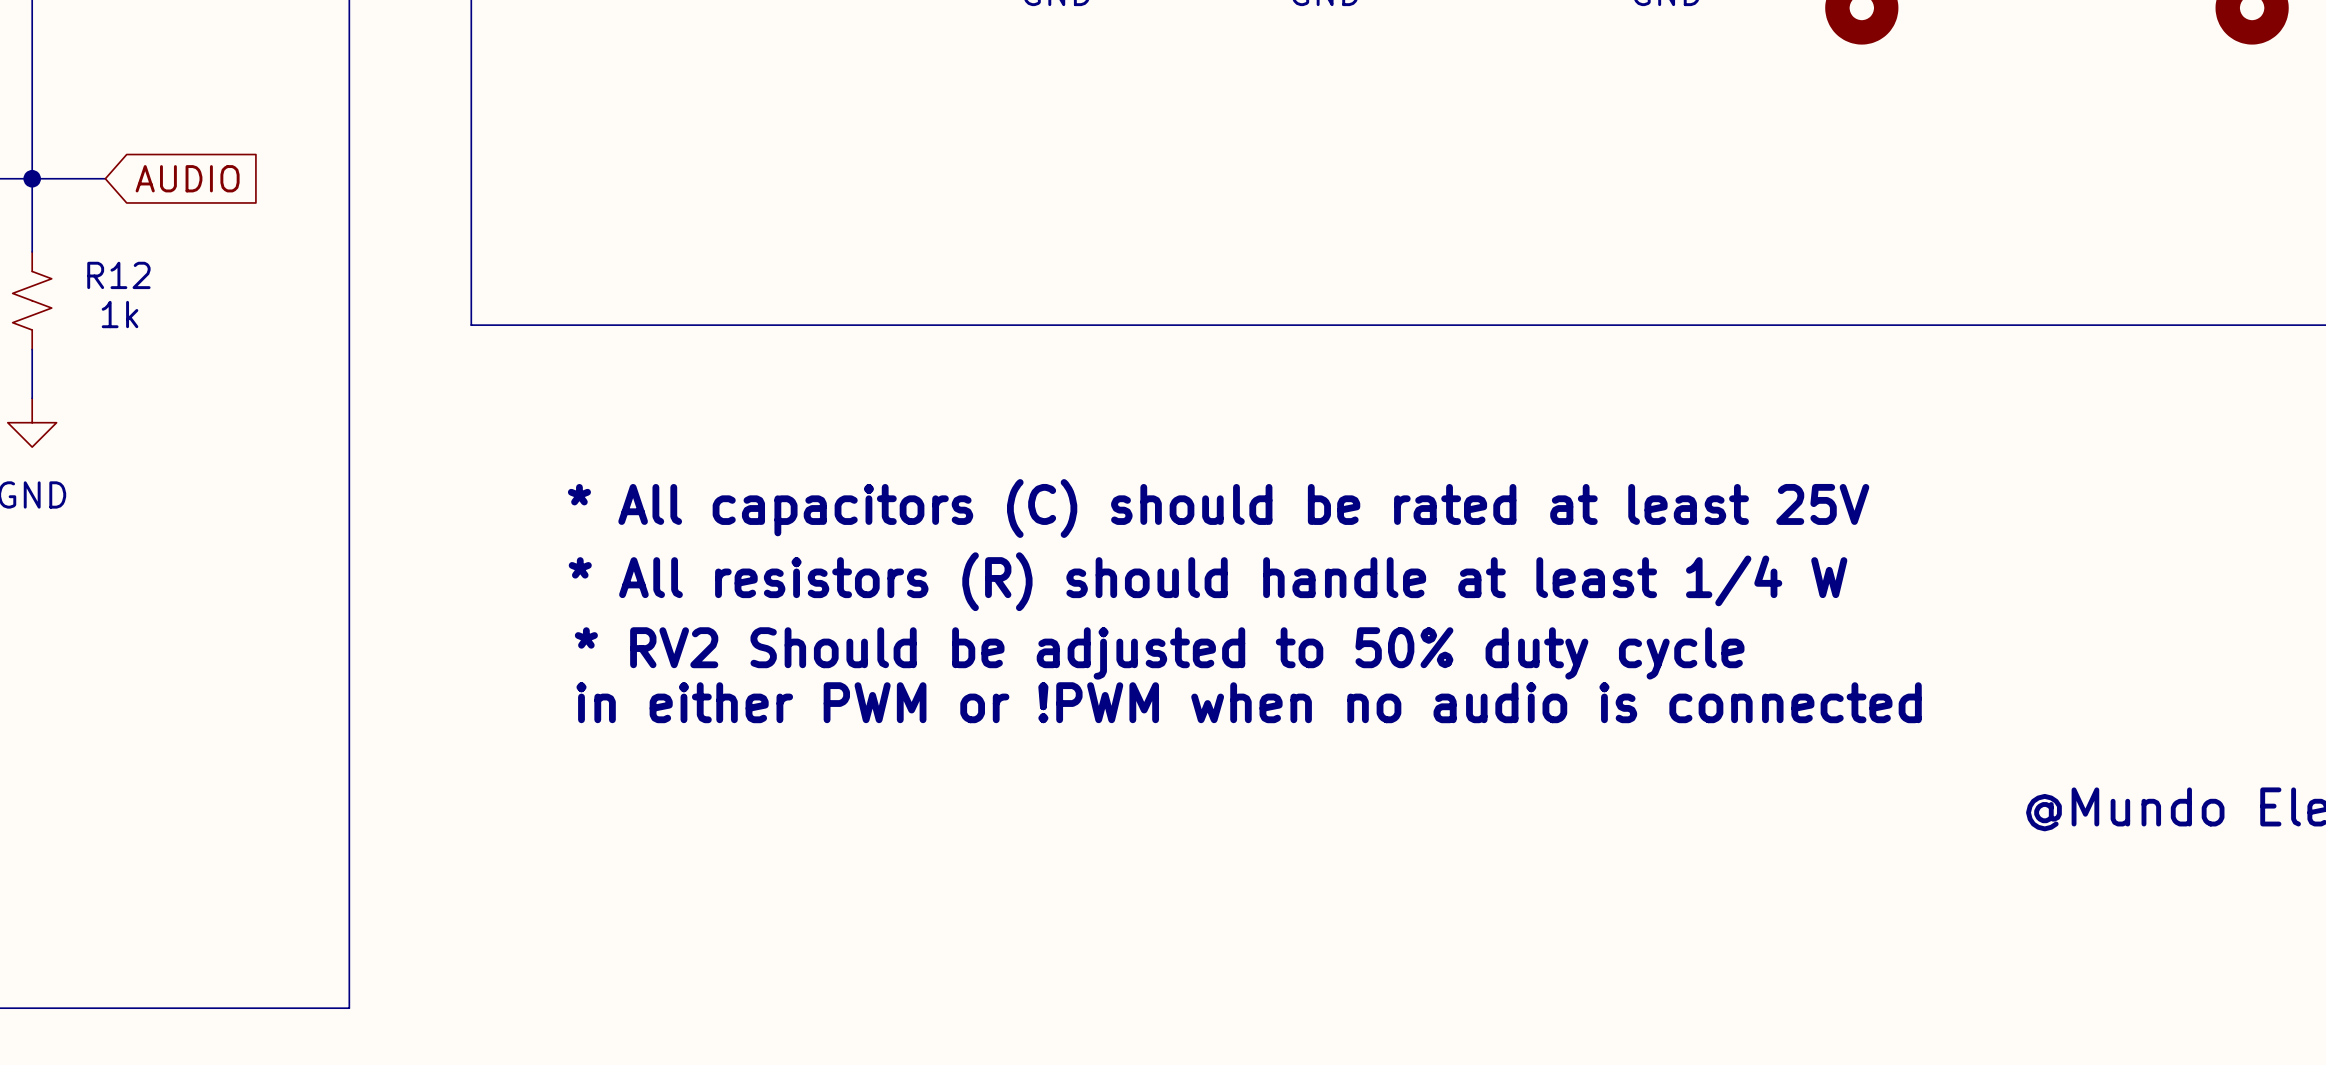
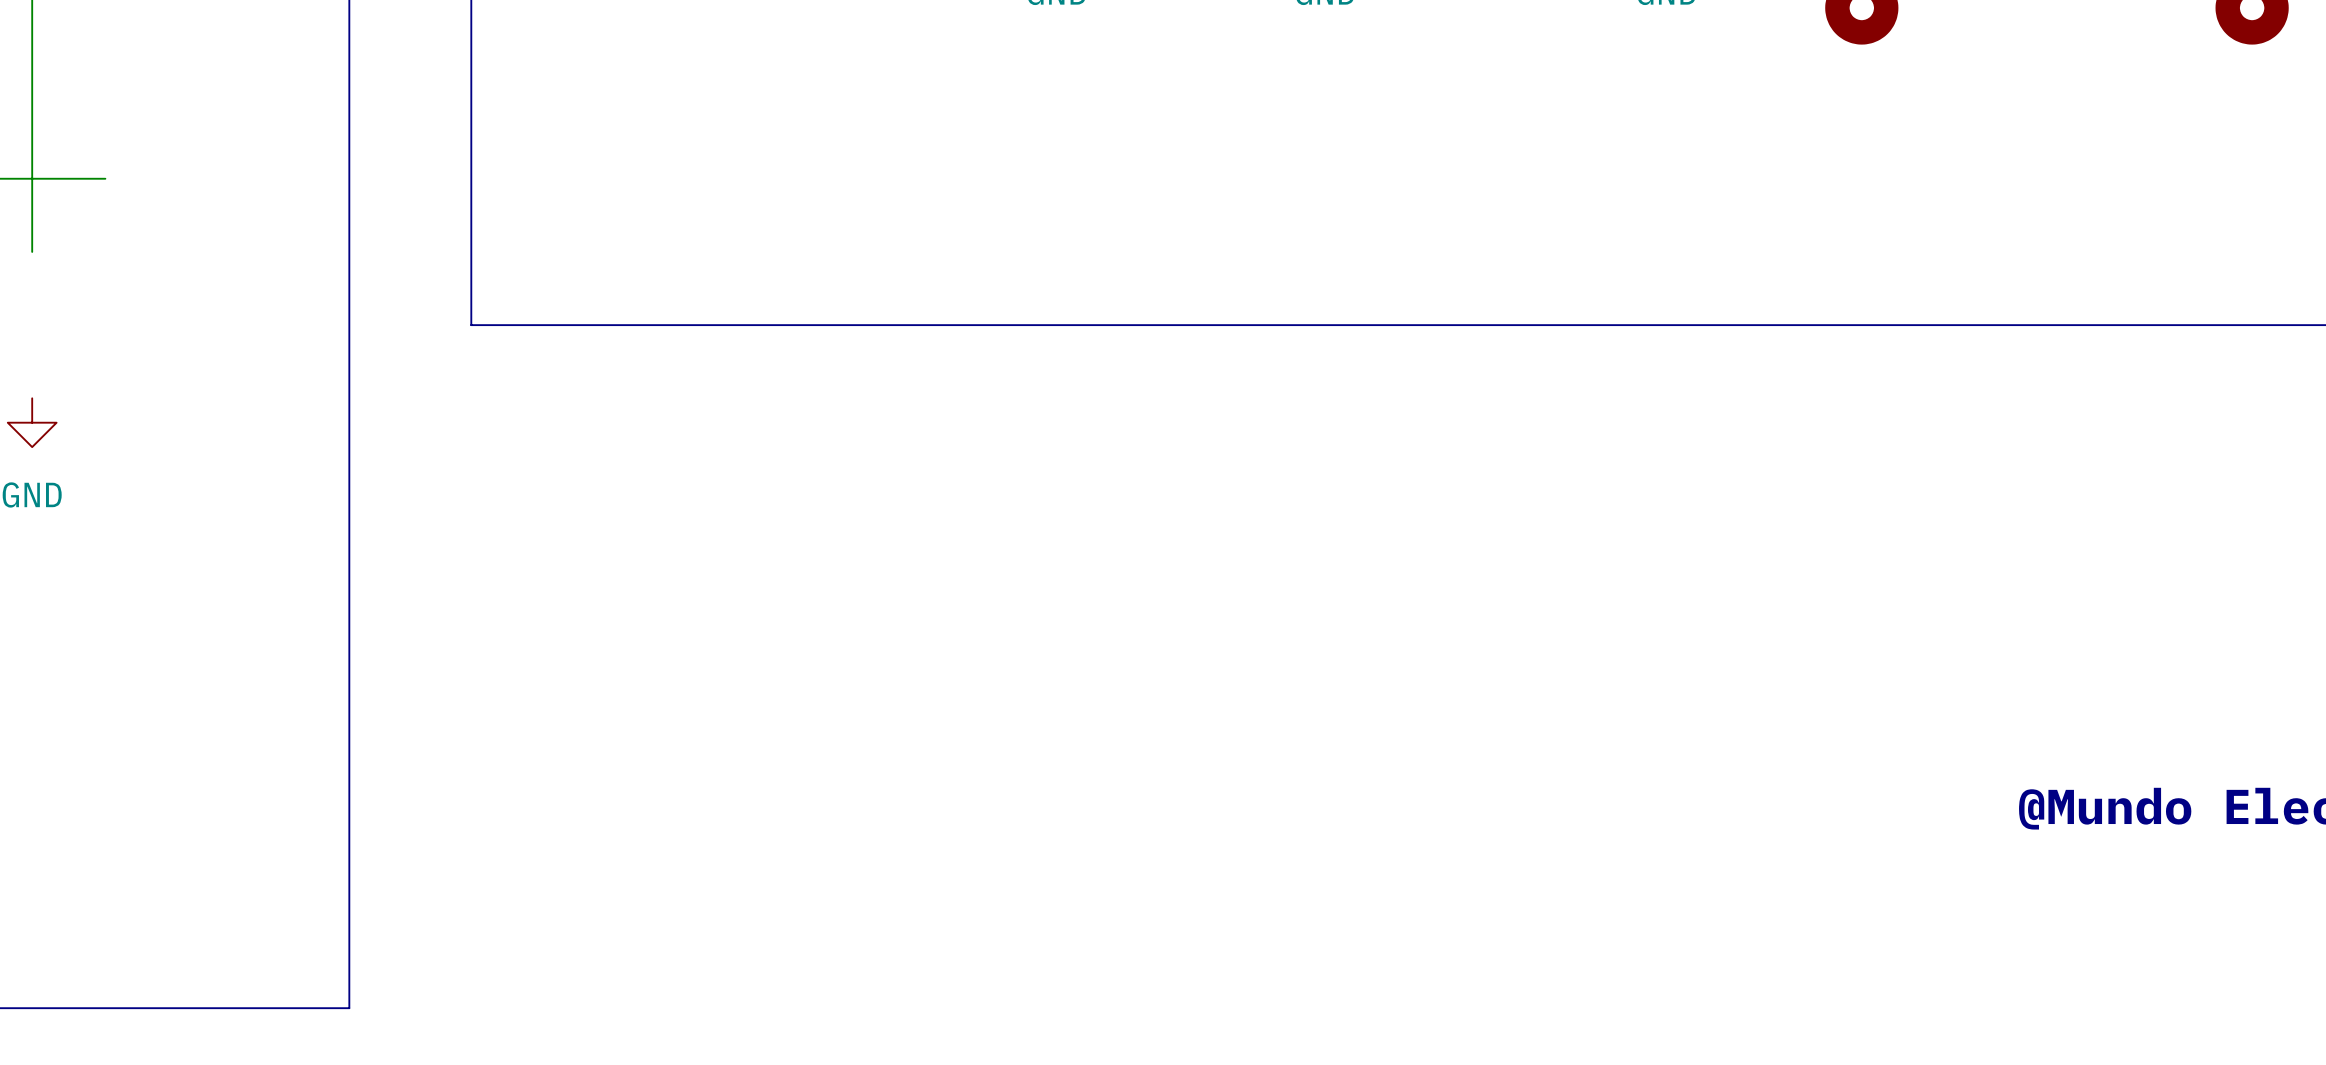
junction: (32, 178) -> none
global label: AUDIO (187, 178) -> none
R12: (32, 300) -> none
text: 1k (120, 314) -> none
wire: (32, 349) (32, 398) -> none
text: * All capacitors (C) should be rated at least 25V (1218, 508) -> none
text: * All resistors (R) should handle at least 1/4 W (1208, 581) -> none
text: * RV2 Should be adjusted to 50% duty cycle (1159, 653) -> none
text: in either PWM or !PWM when no audio is connected (1249, 702) -> none

